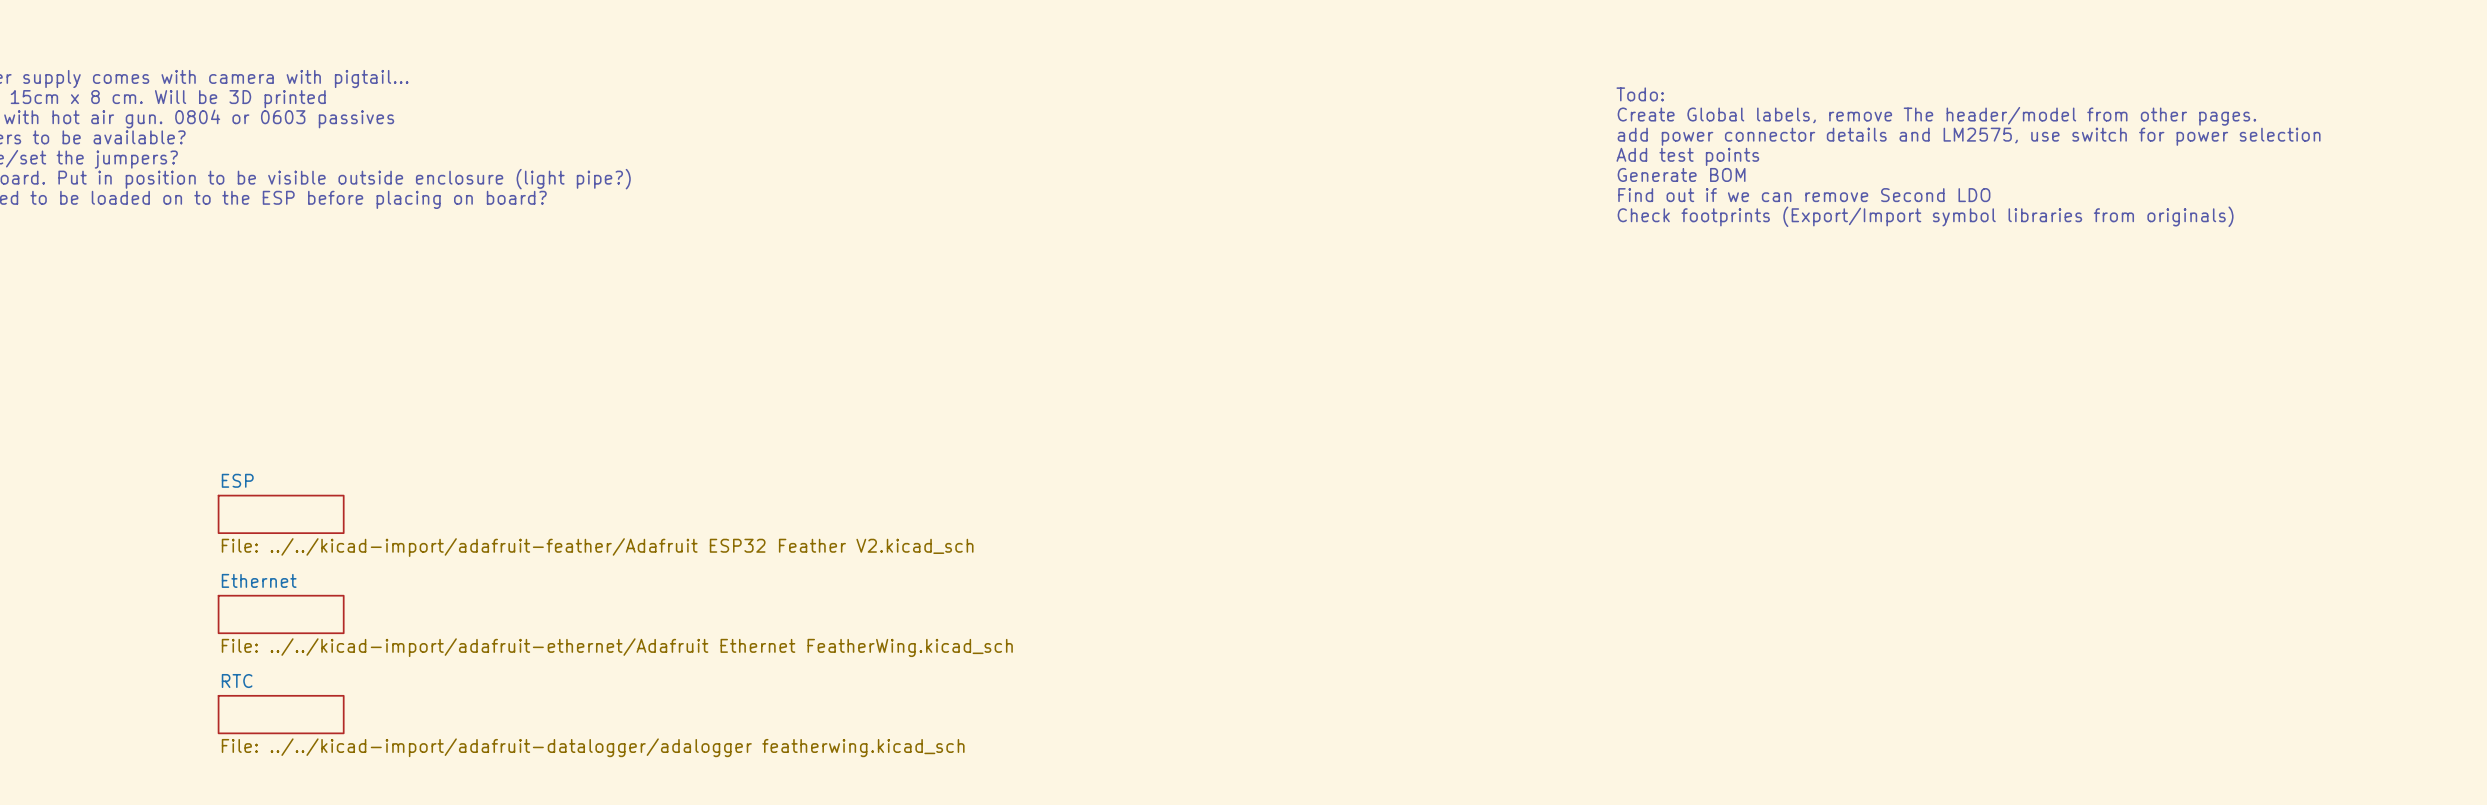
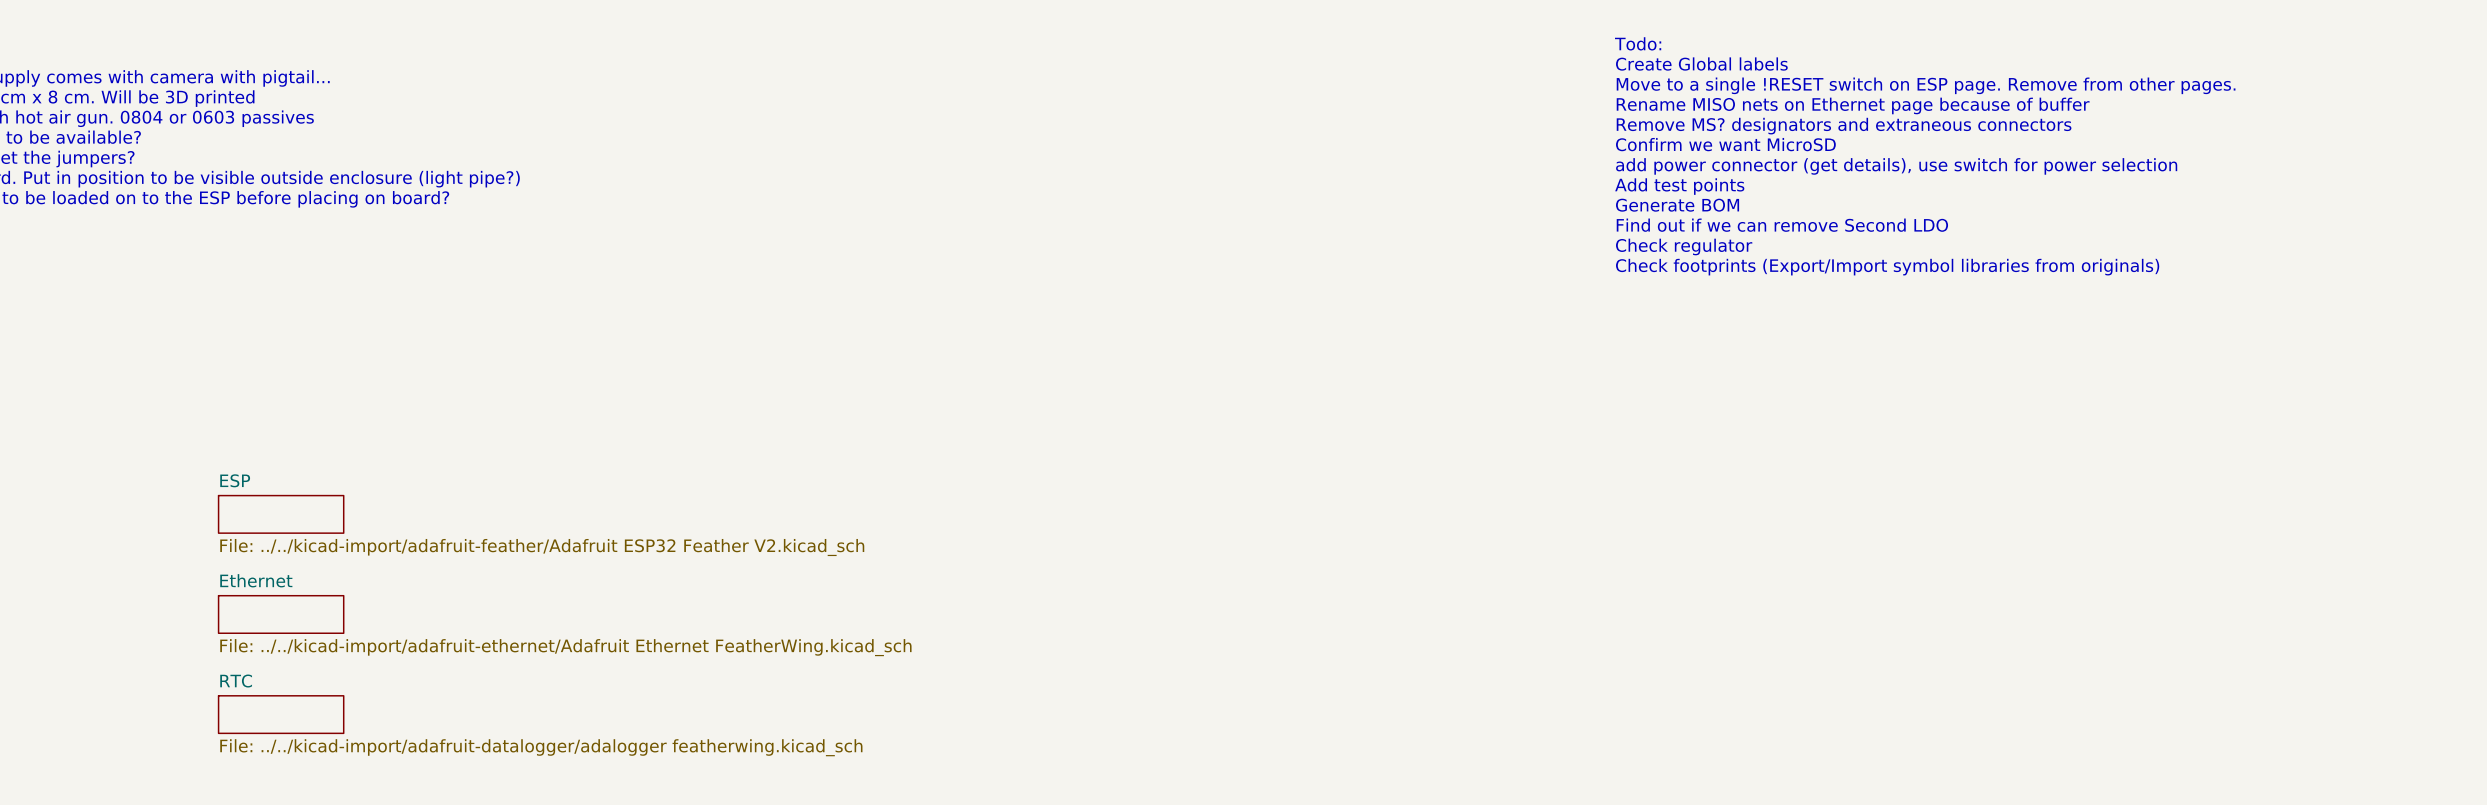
text: none -> Create Global labels (1701, 64)
text: none -> Move to a single !RESET switch on ESP page. Remove from other pages. (1926, 85)
text position: Todo: (1640, 94) -> Todo: (1638, 43)
text: none -> Rename MISO nets on Ethernet page because of buffer (1853, 105)
text: Create Global labels, remove The header/model from other pages. (1936, 116) -> none
text: none -> Remove MS? designators and extraneous connectors (1844, 126)
text: add power connector details and LM2575, use switch for power selection (1969, 136) -> none
text: none -> Confirm we want MicroSD (1725, 144)
text position: Add test points (1687, 156) -> Add test points (1679, 186)
text: none -> add power connector (get details), use switch for power selection (1896, 166)
text position: Generate BOM (1681, 174) -> Generate BOM (1677, 205)
text position: Find out if we can remove Second LDO (1804, 195) -> Find out if we can remove Second LDO (1782, 225)
text position: Check footprints (Export/Import symbol libraries from originals) (1925, 216) -> Check footprints (Export/Import symbol libraries from originals) (1887, 267)
text: none -> Check regulator (1684, 246)

